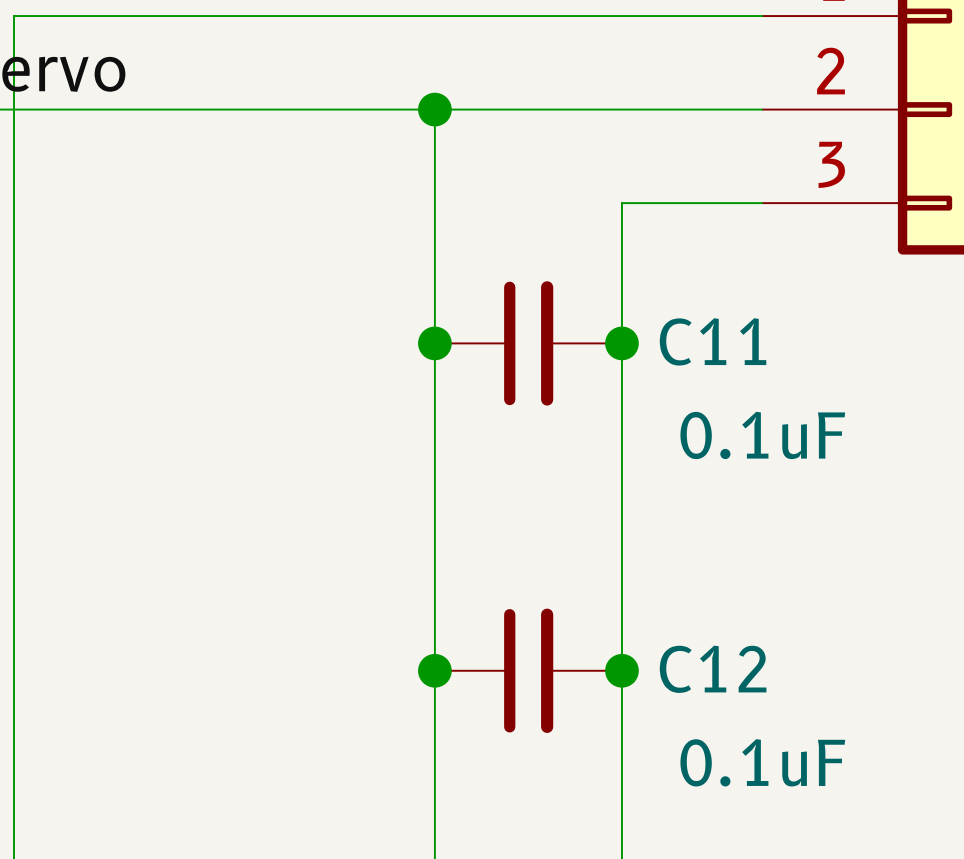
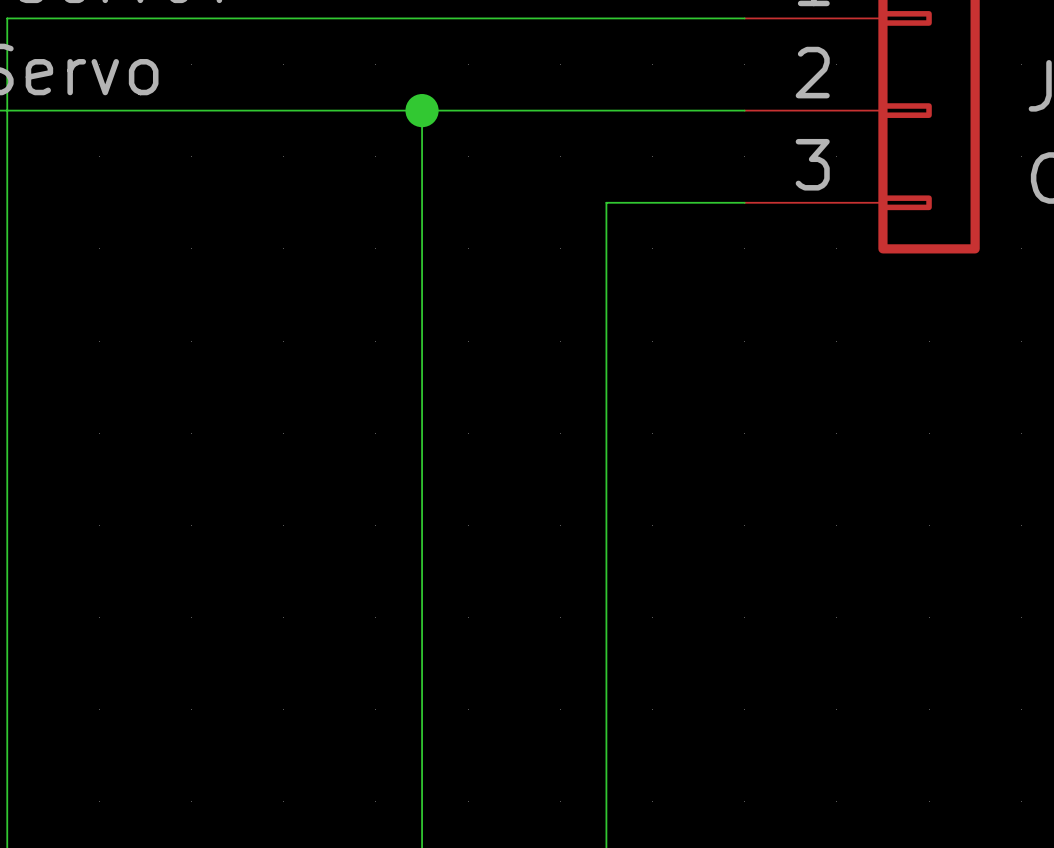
junction: (434, 343) -> none
C11: 0.1uF (528, 343) -> none
junction: (621, 343) -> none
junction: (434, 670) -> none
C12: 0.1uF (528, 670) -> none
junction: (621, 670) -> none

